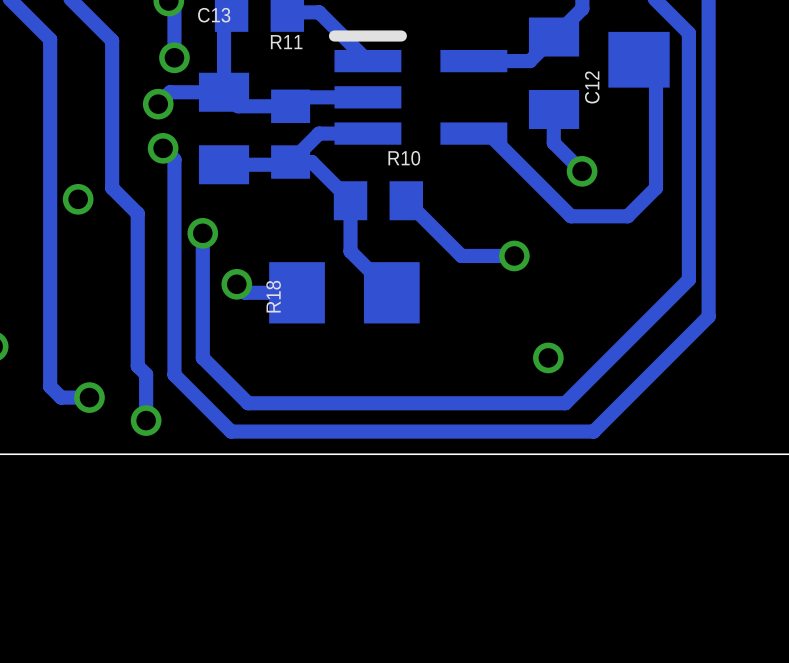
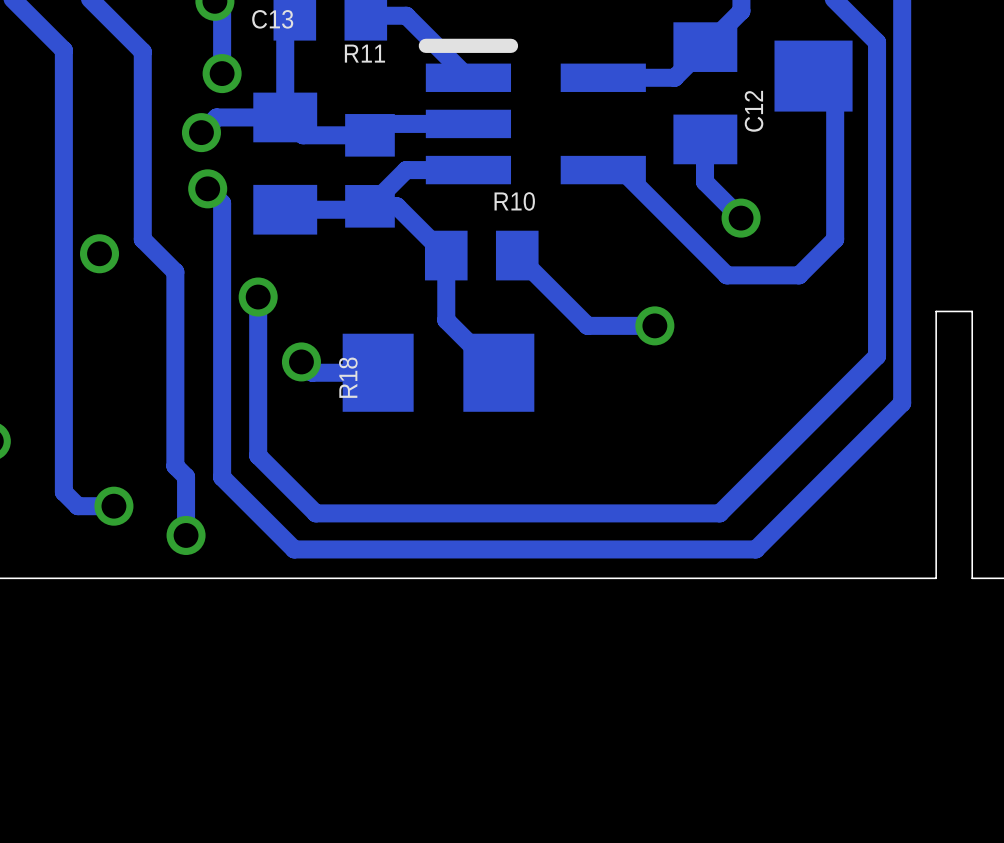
via: (548, 357) -> none
board edge: (763, 454) (735, 454) -> (972, 578) (972, 311) (936, 311) (936, 578)

